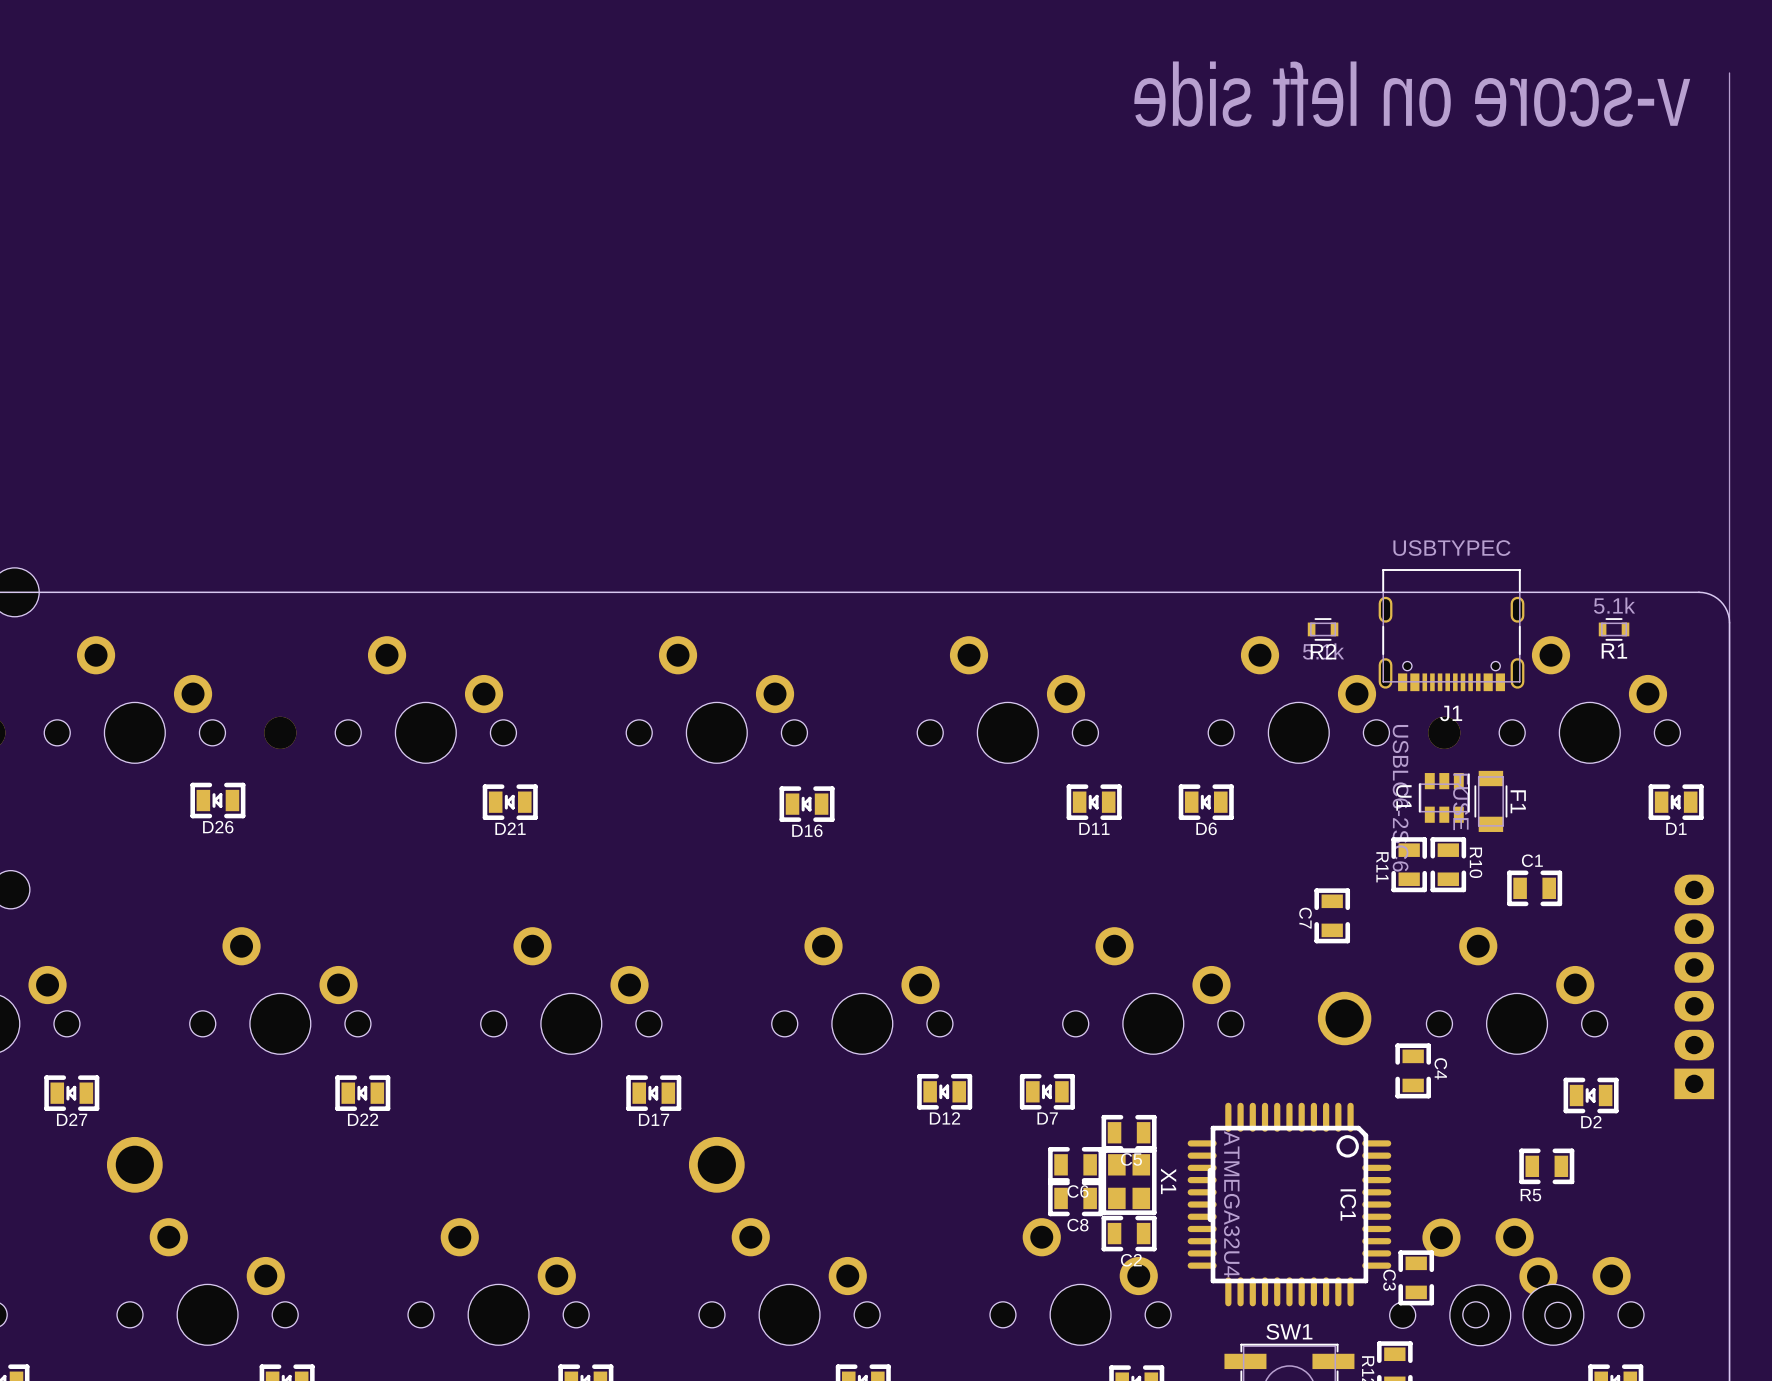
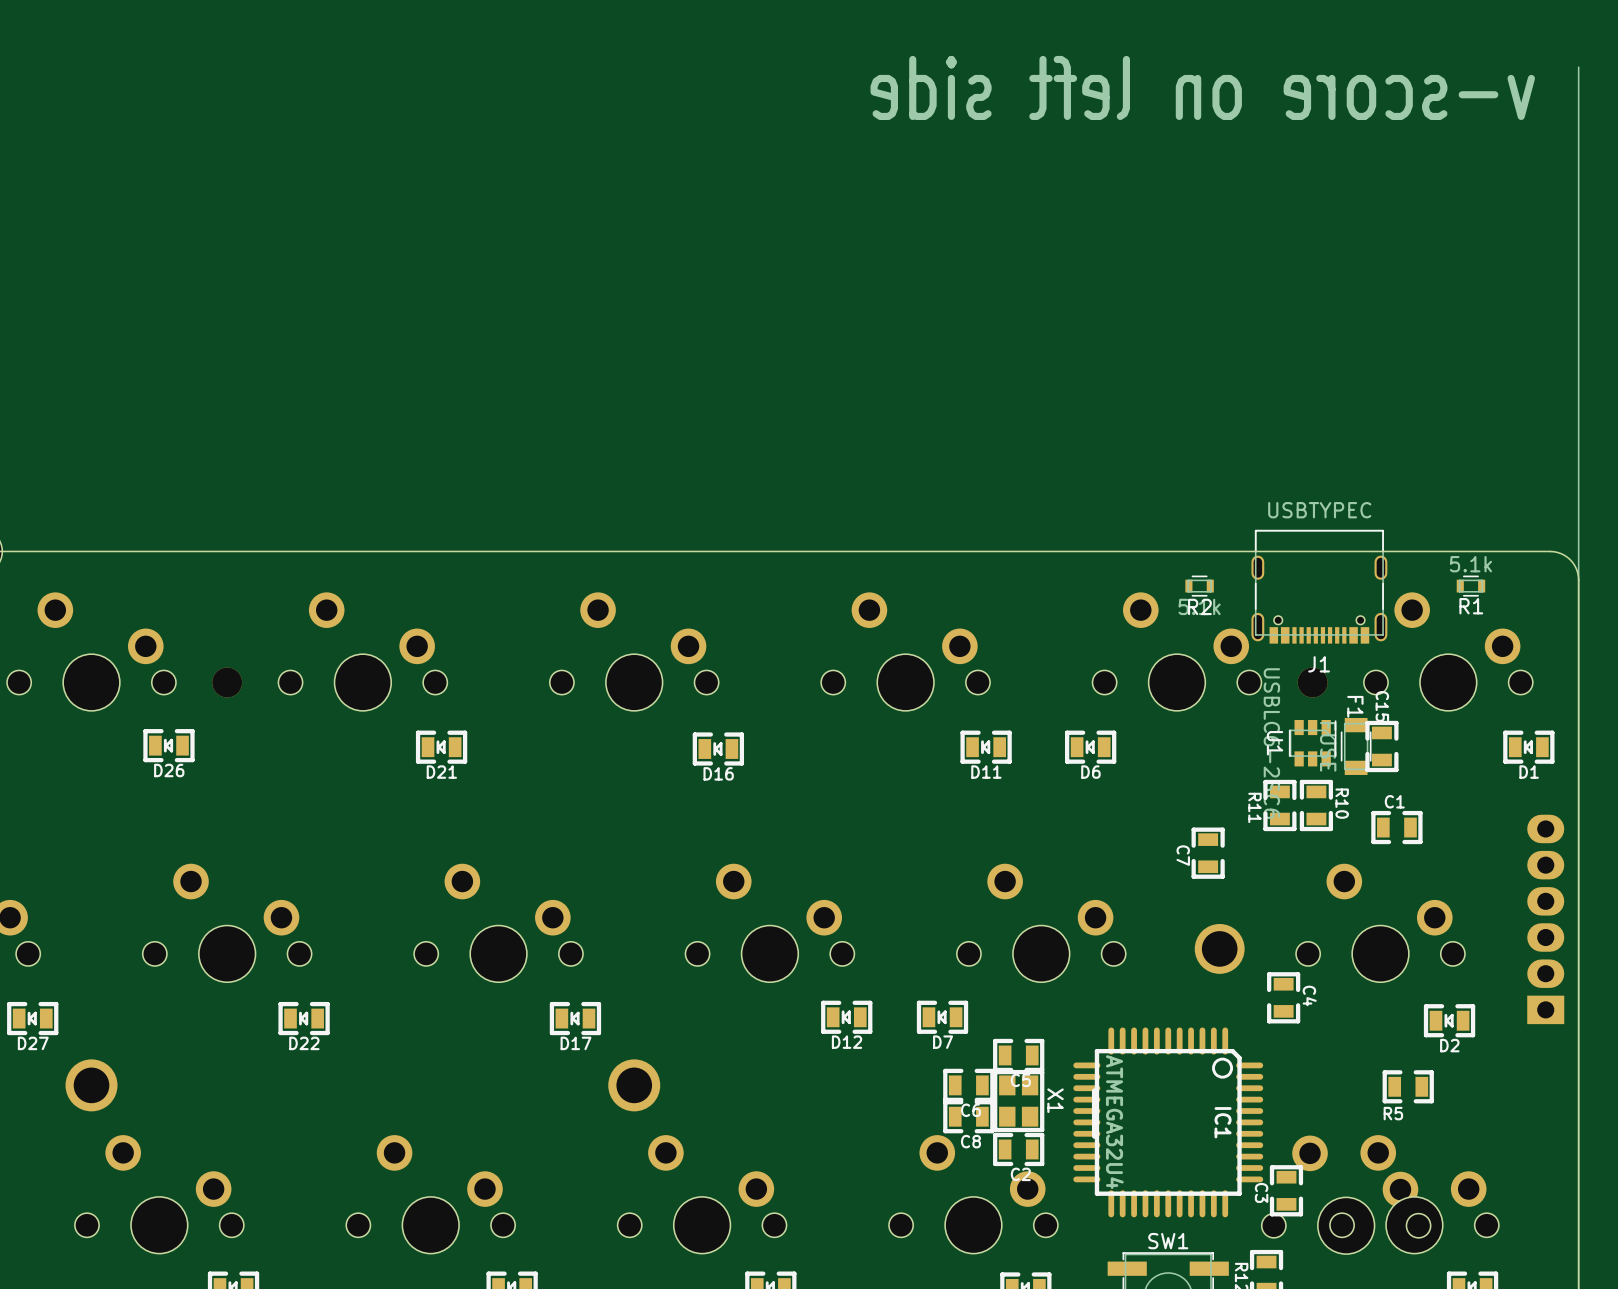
F1 name position: F1 (1518, 801) -> F1 (1355, 706)
C15: none -> (1381, 746)

